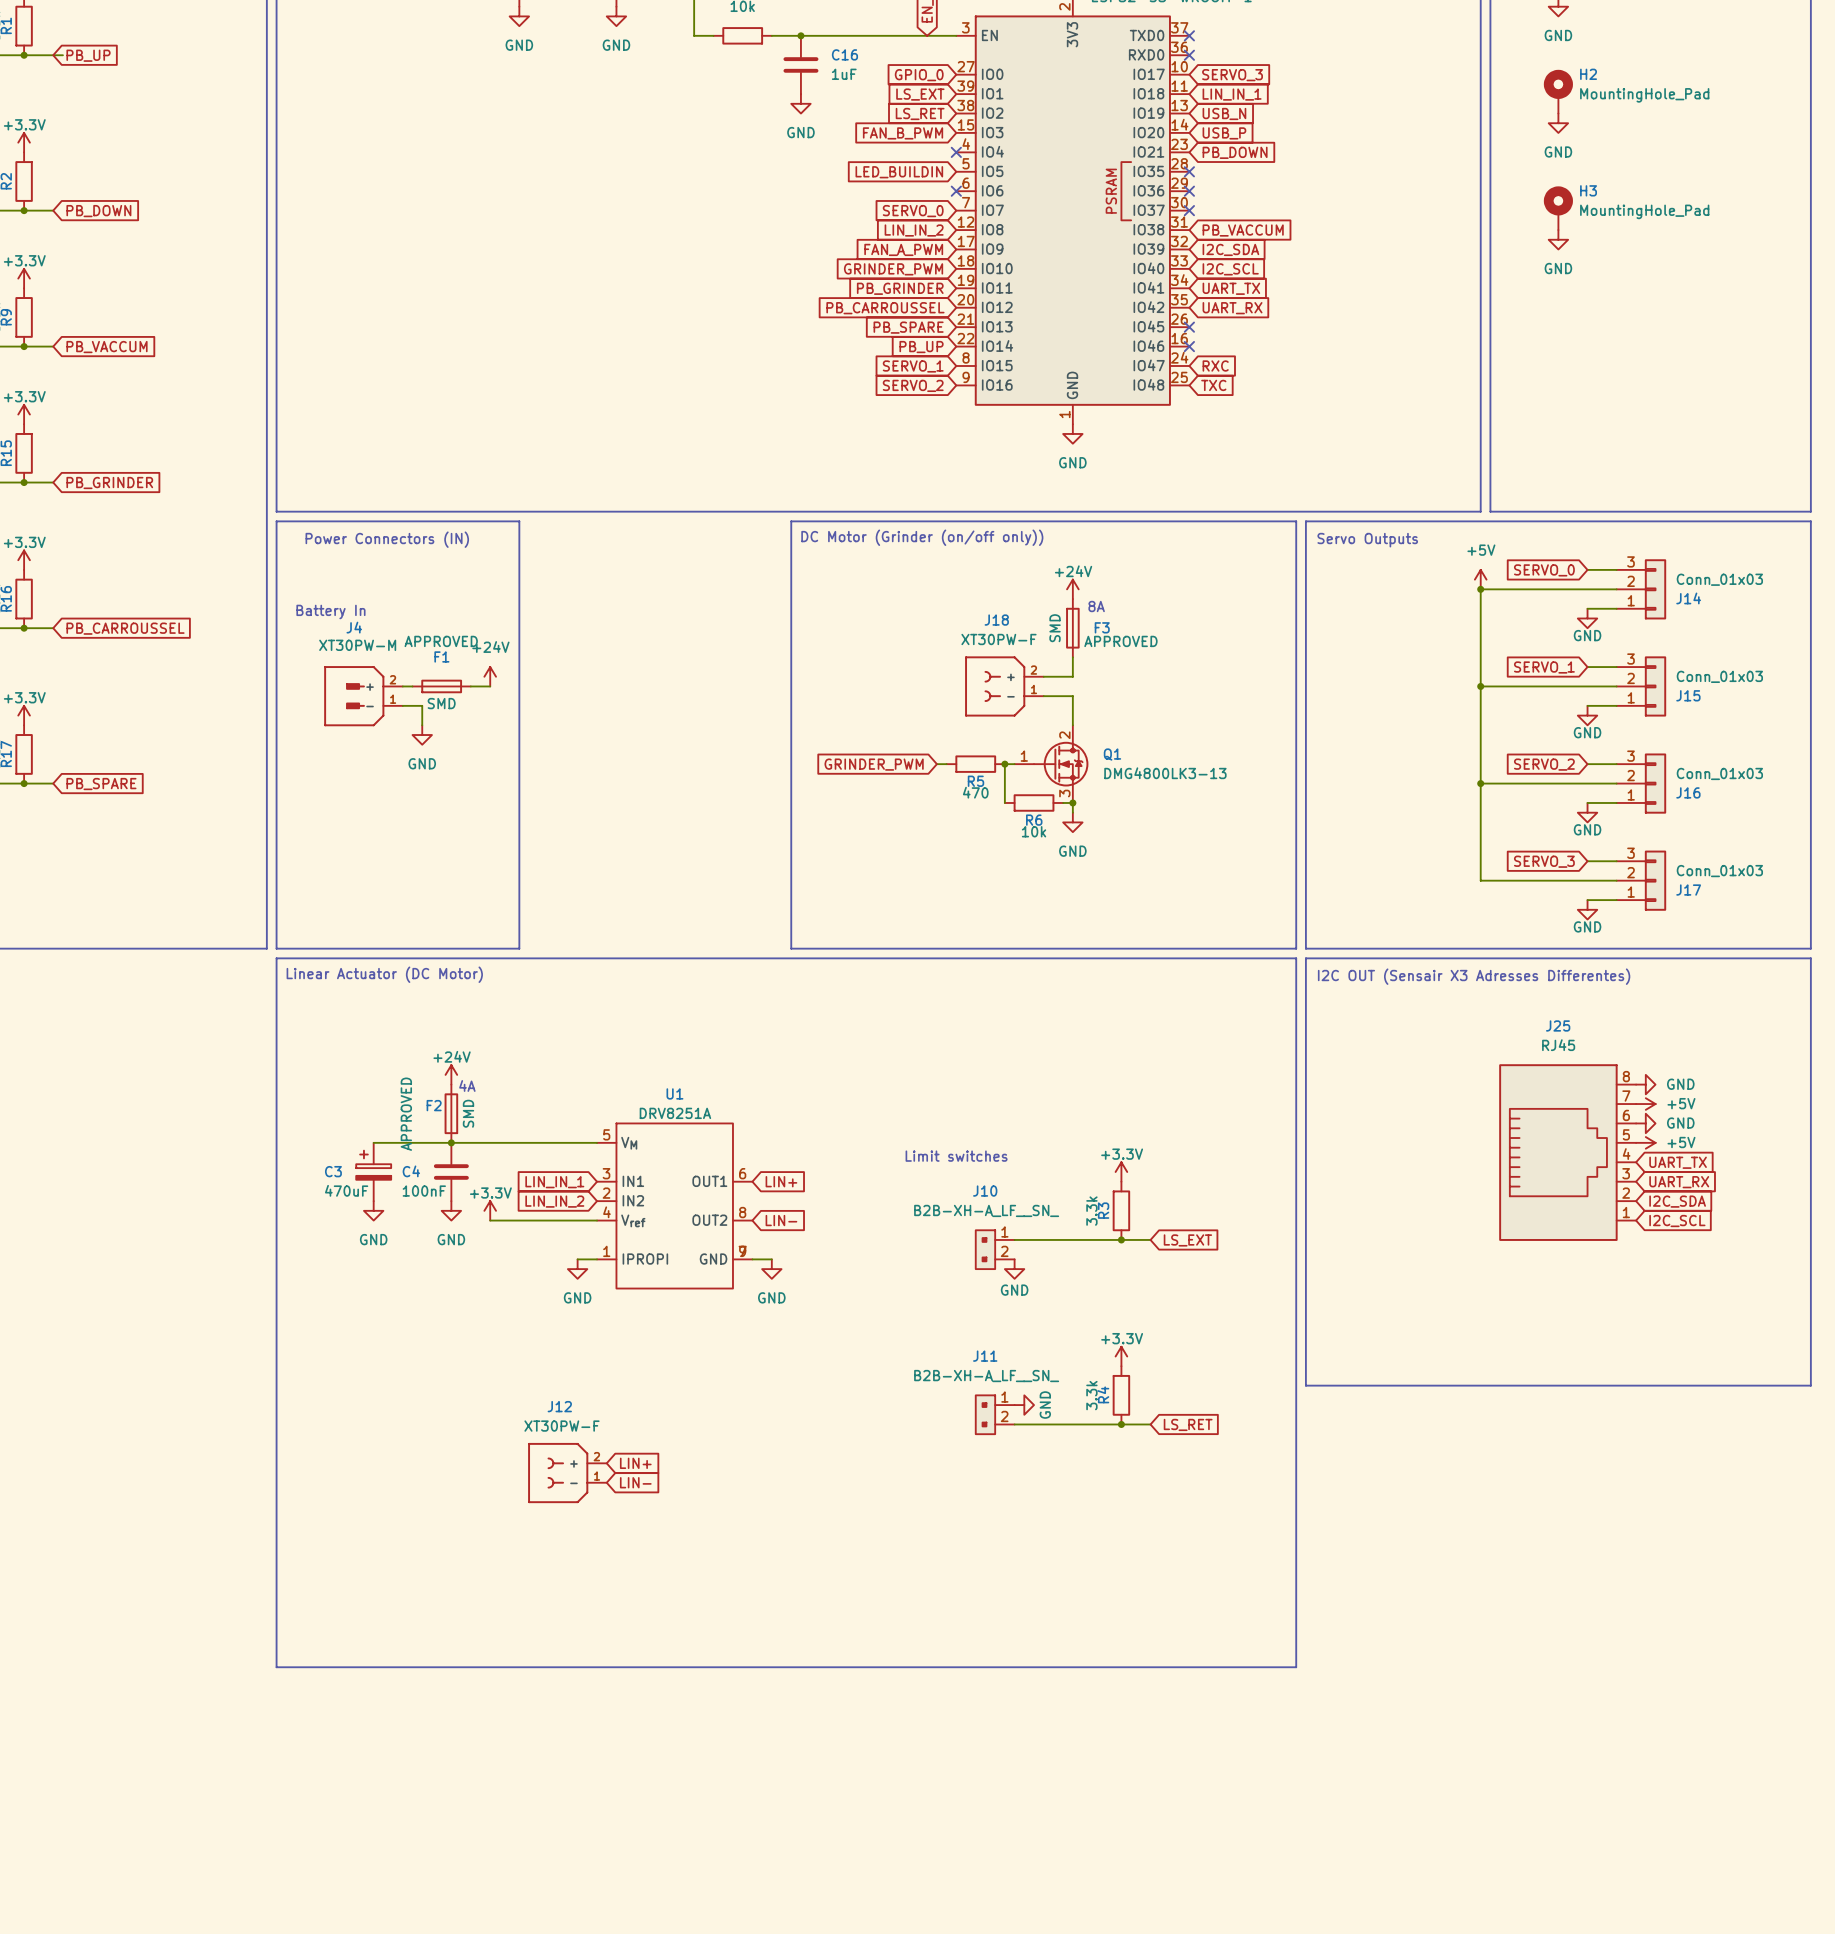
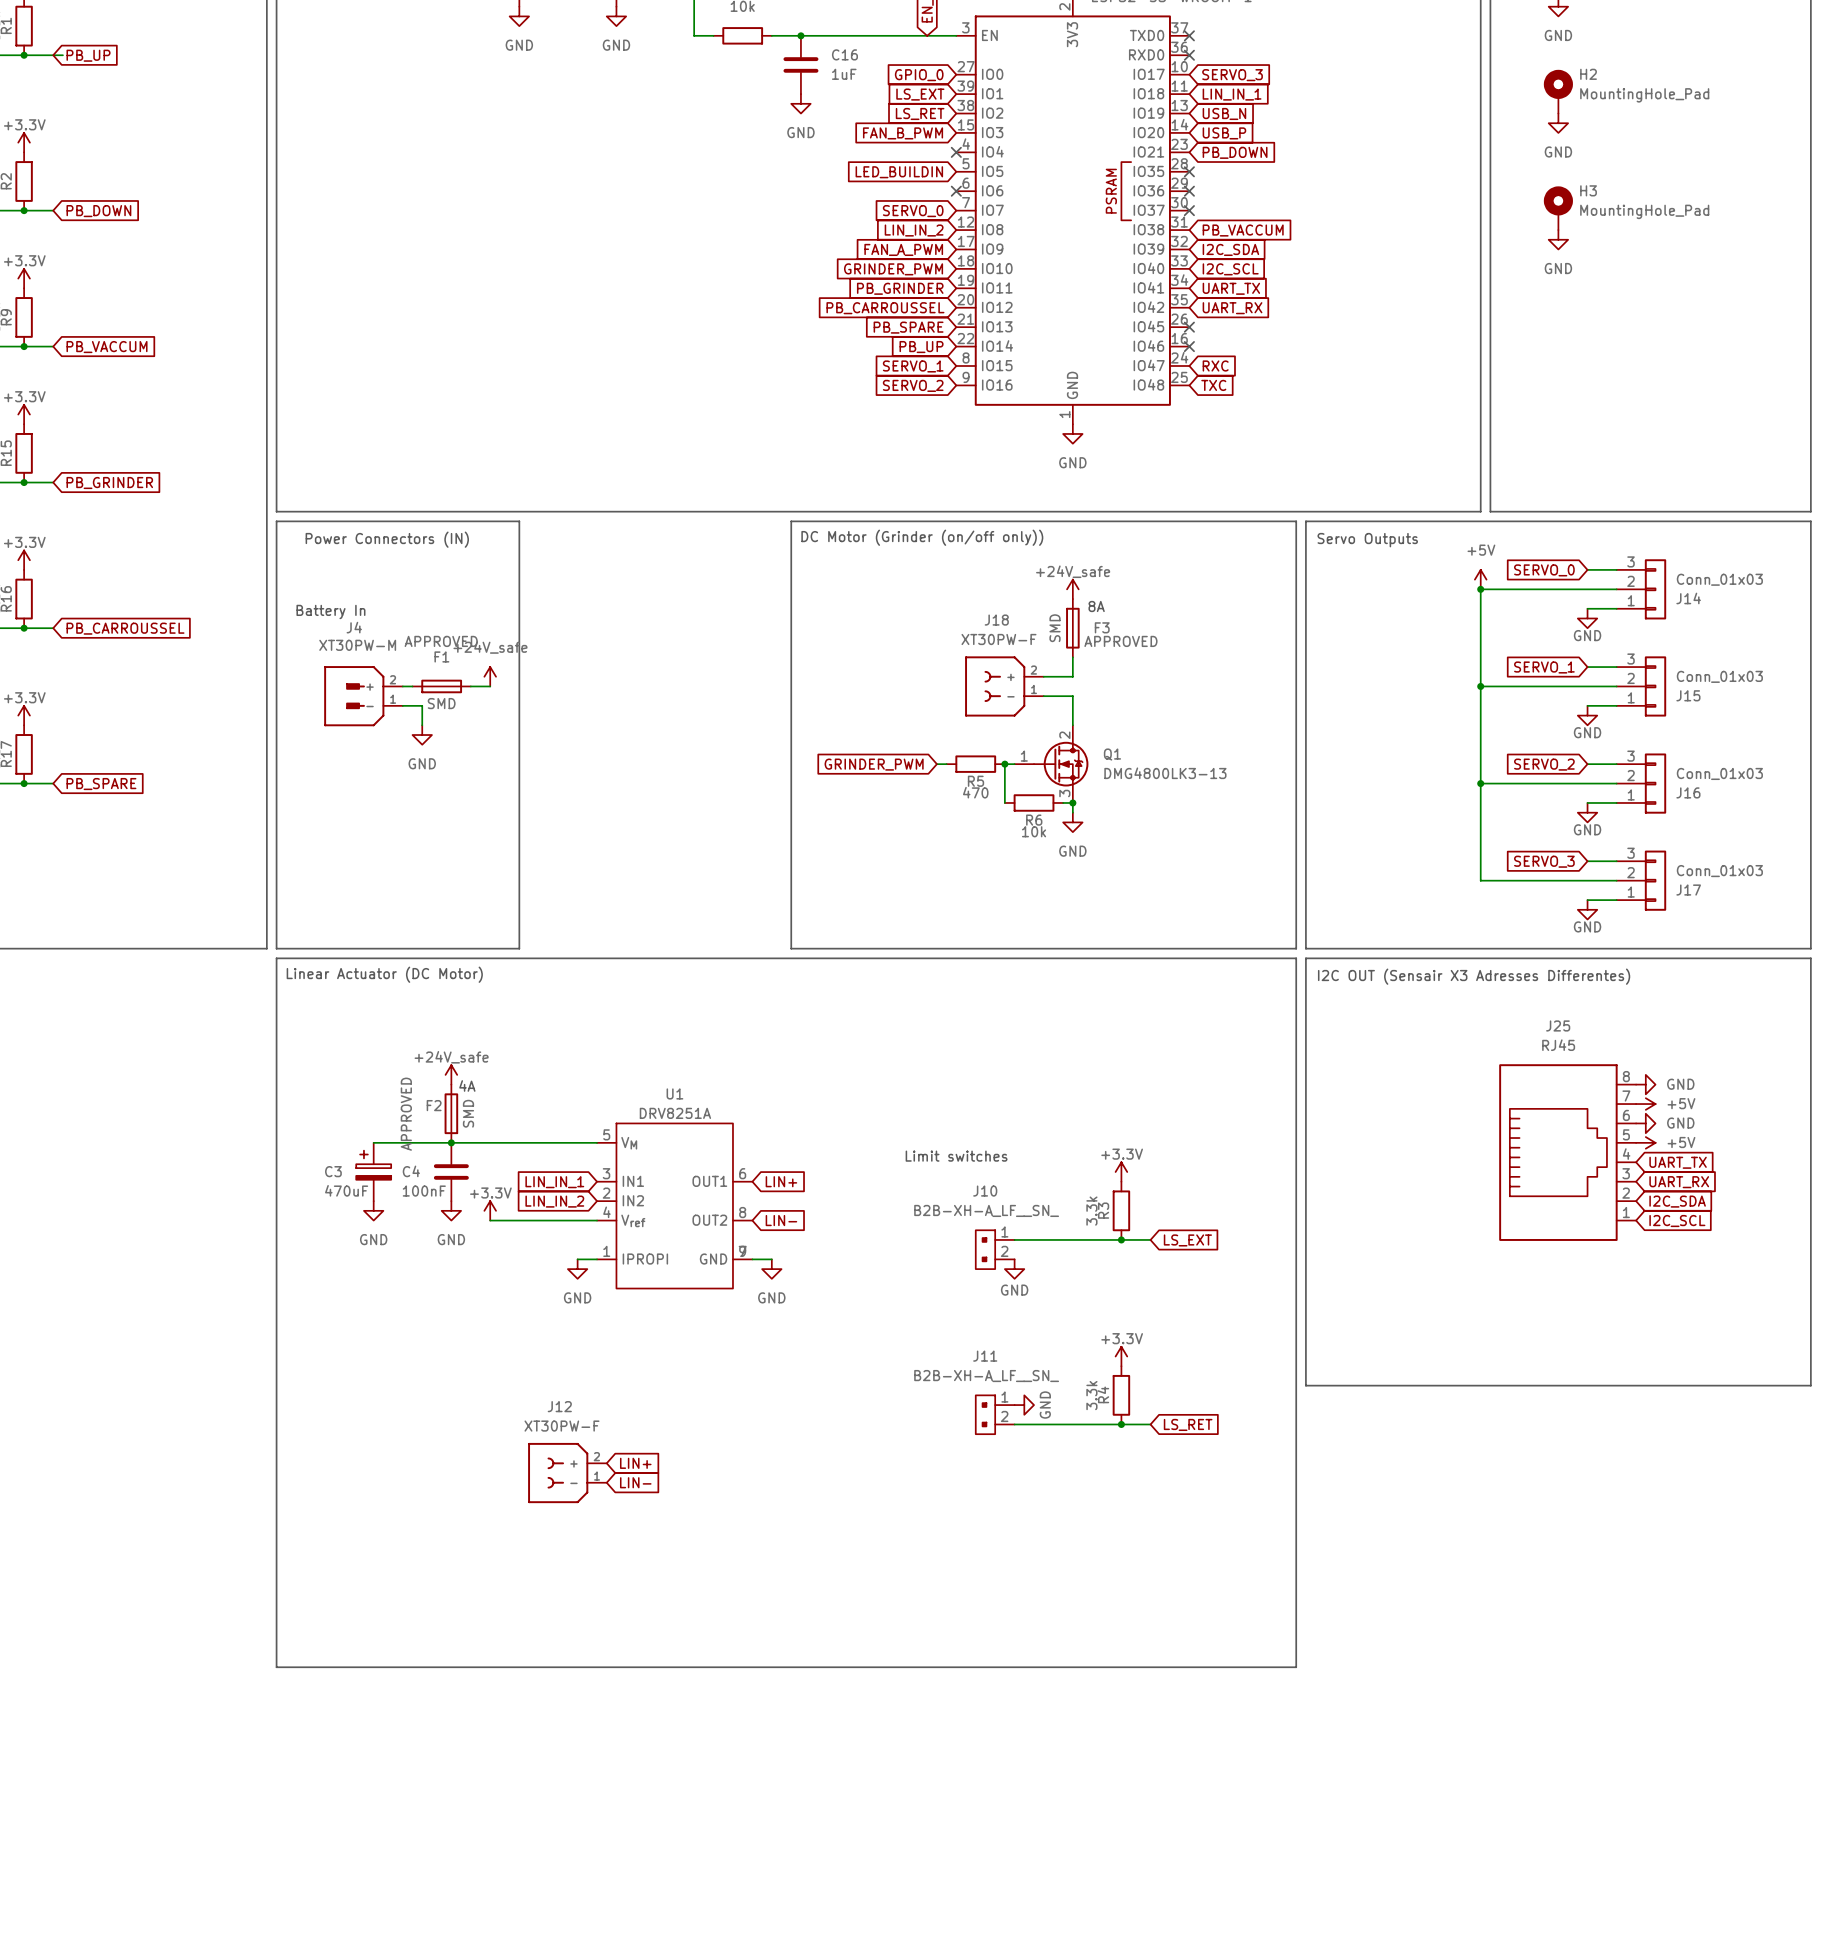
power symbol: +24V (1072, 589) -> +24V_safe (1072, 589)
power symbol: +24V (490, 676) -> +24V_safe (490, 676)
power symbol: +24V (451, 1074) -> +24V_safe (451, 1074)

